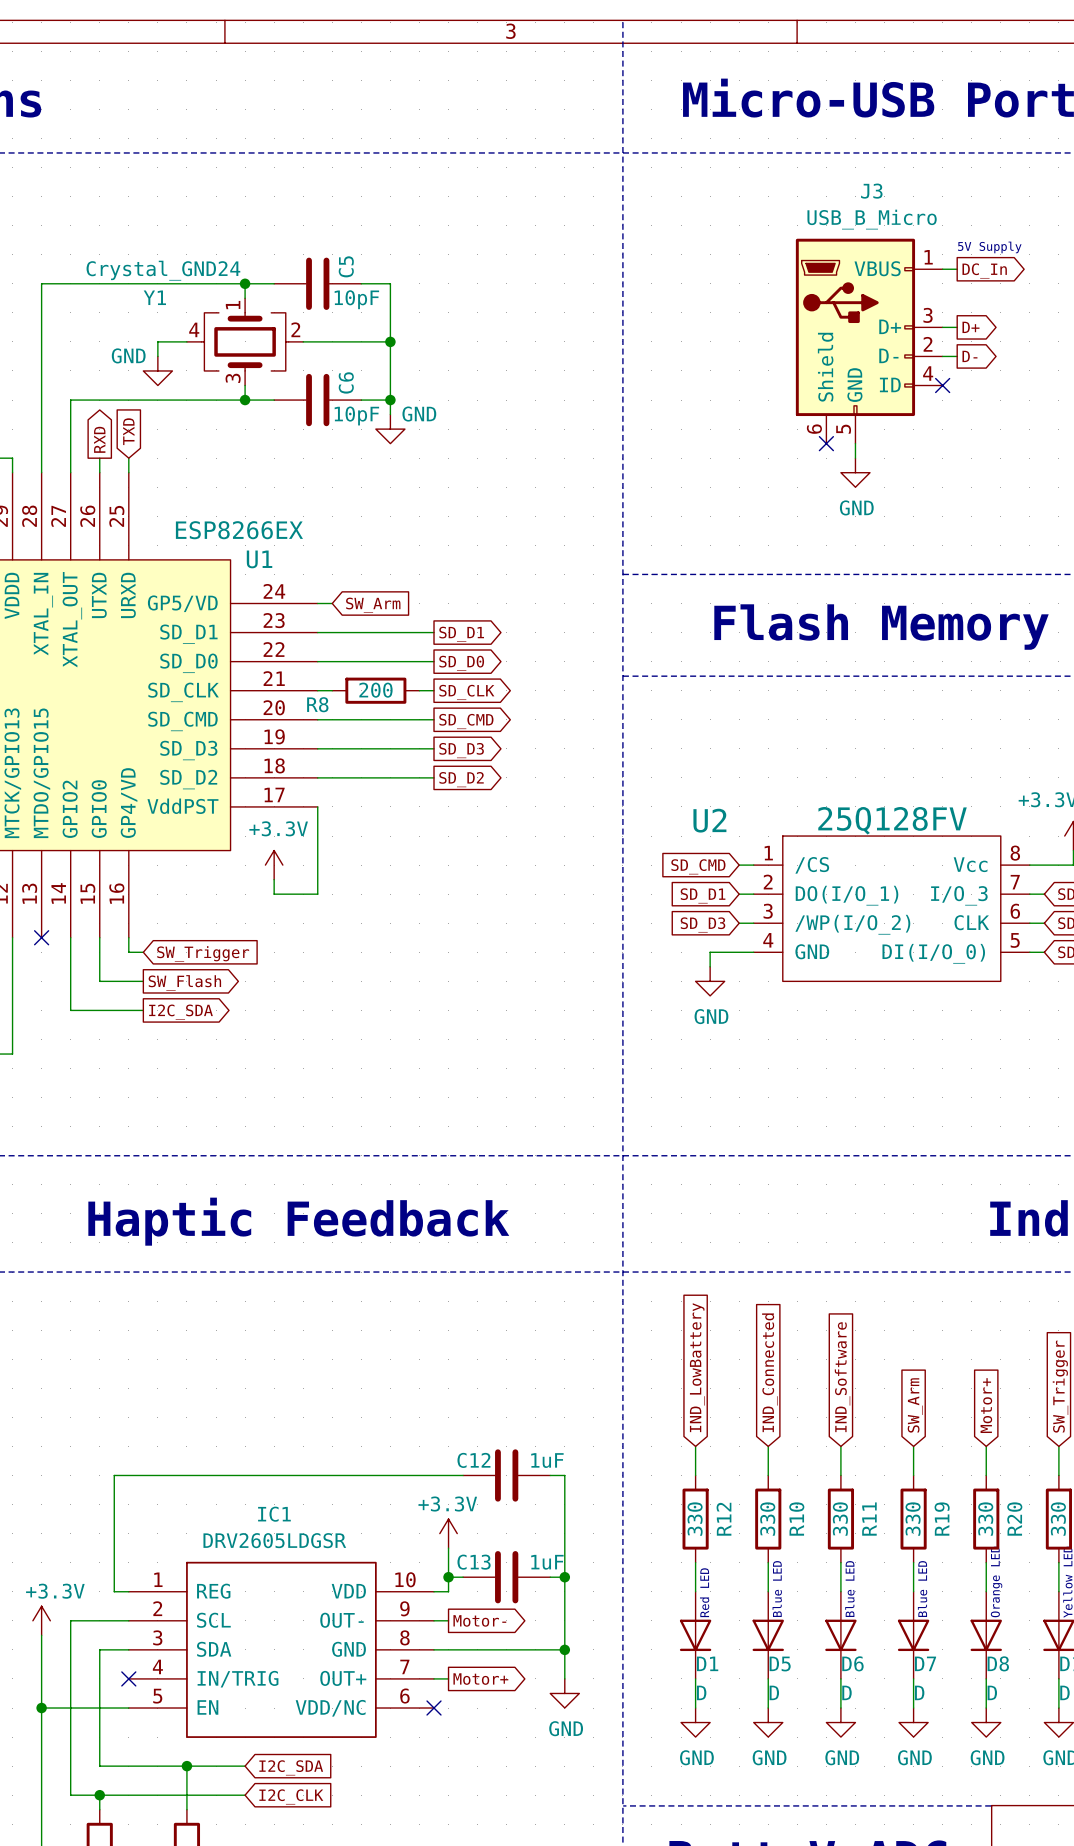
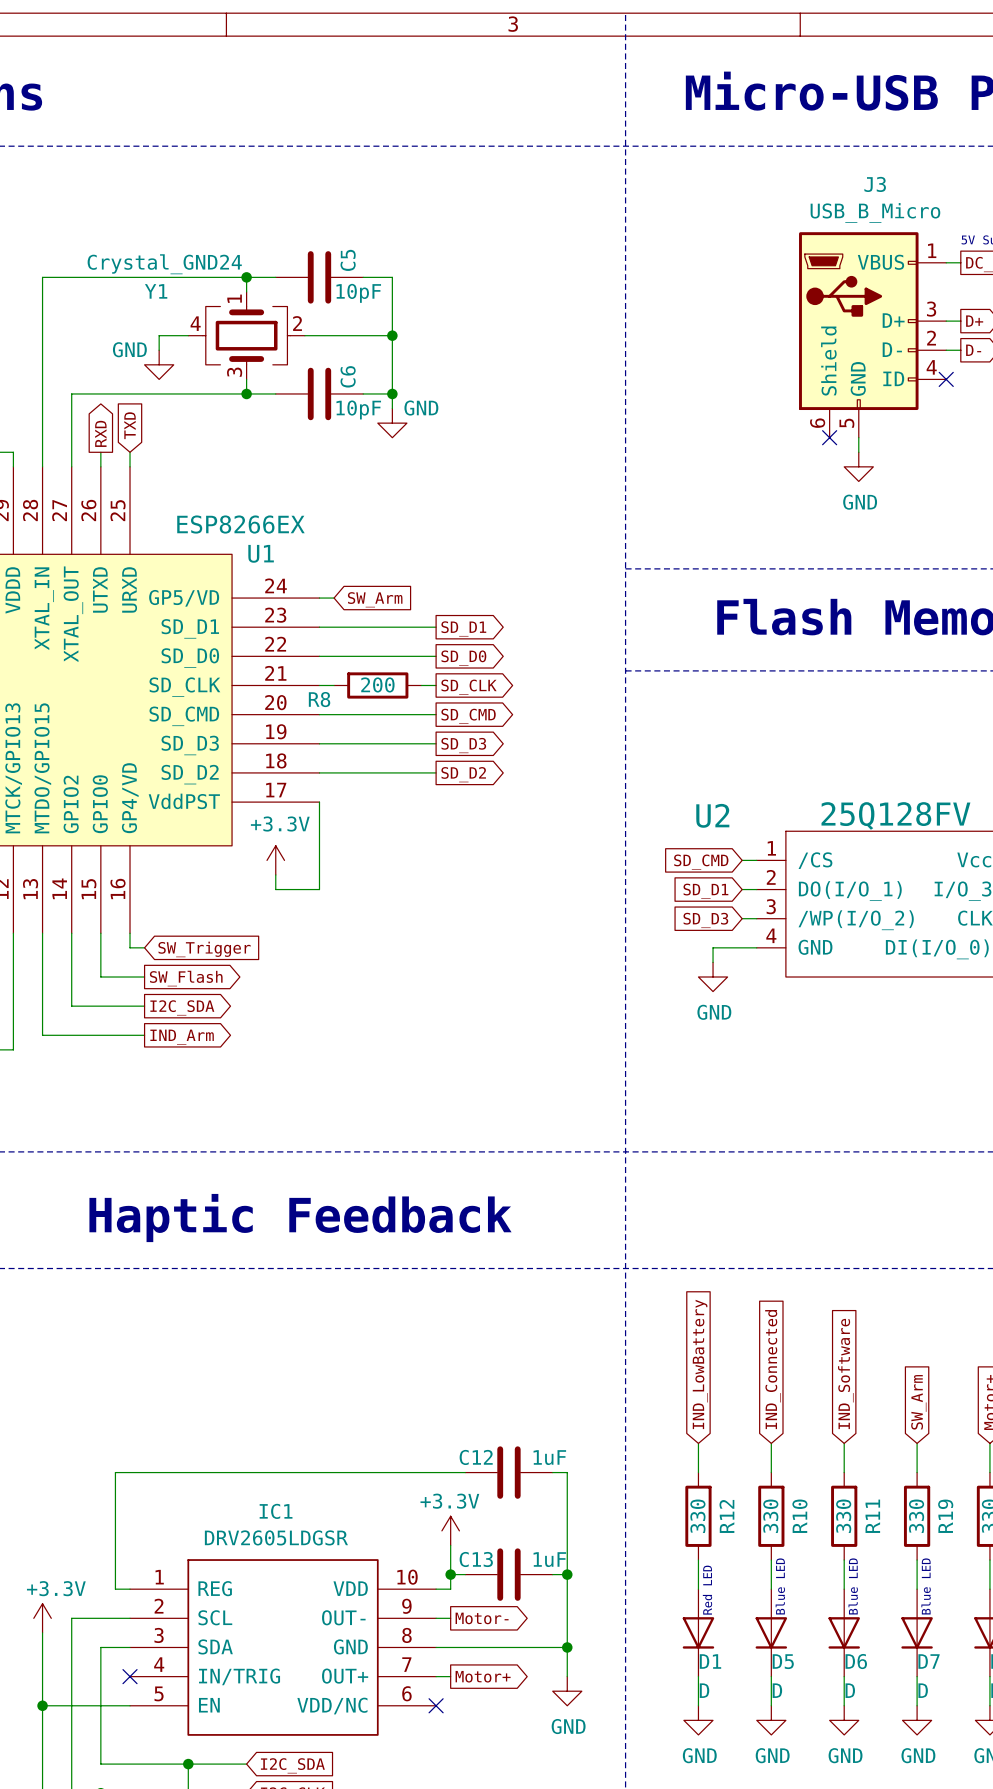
wire: none -> (42, 933) (42, 1035) (144, 1035)
no-connect mark: (41, 937) -> none
global label: none -> IND_Arm (182, 1037)

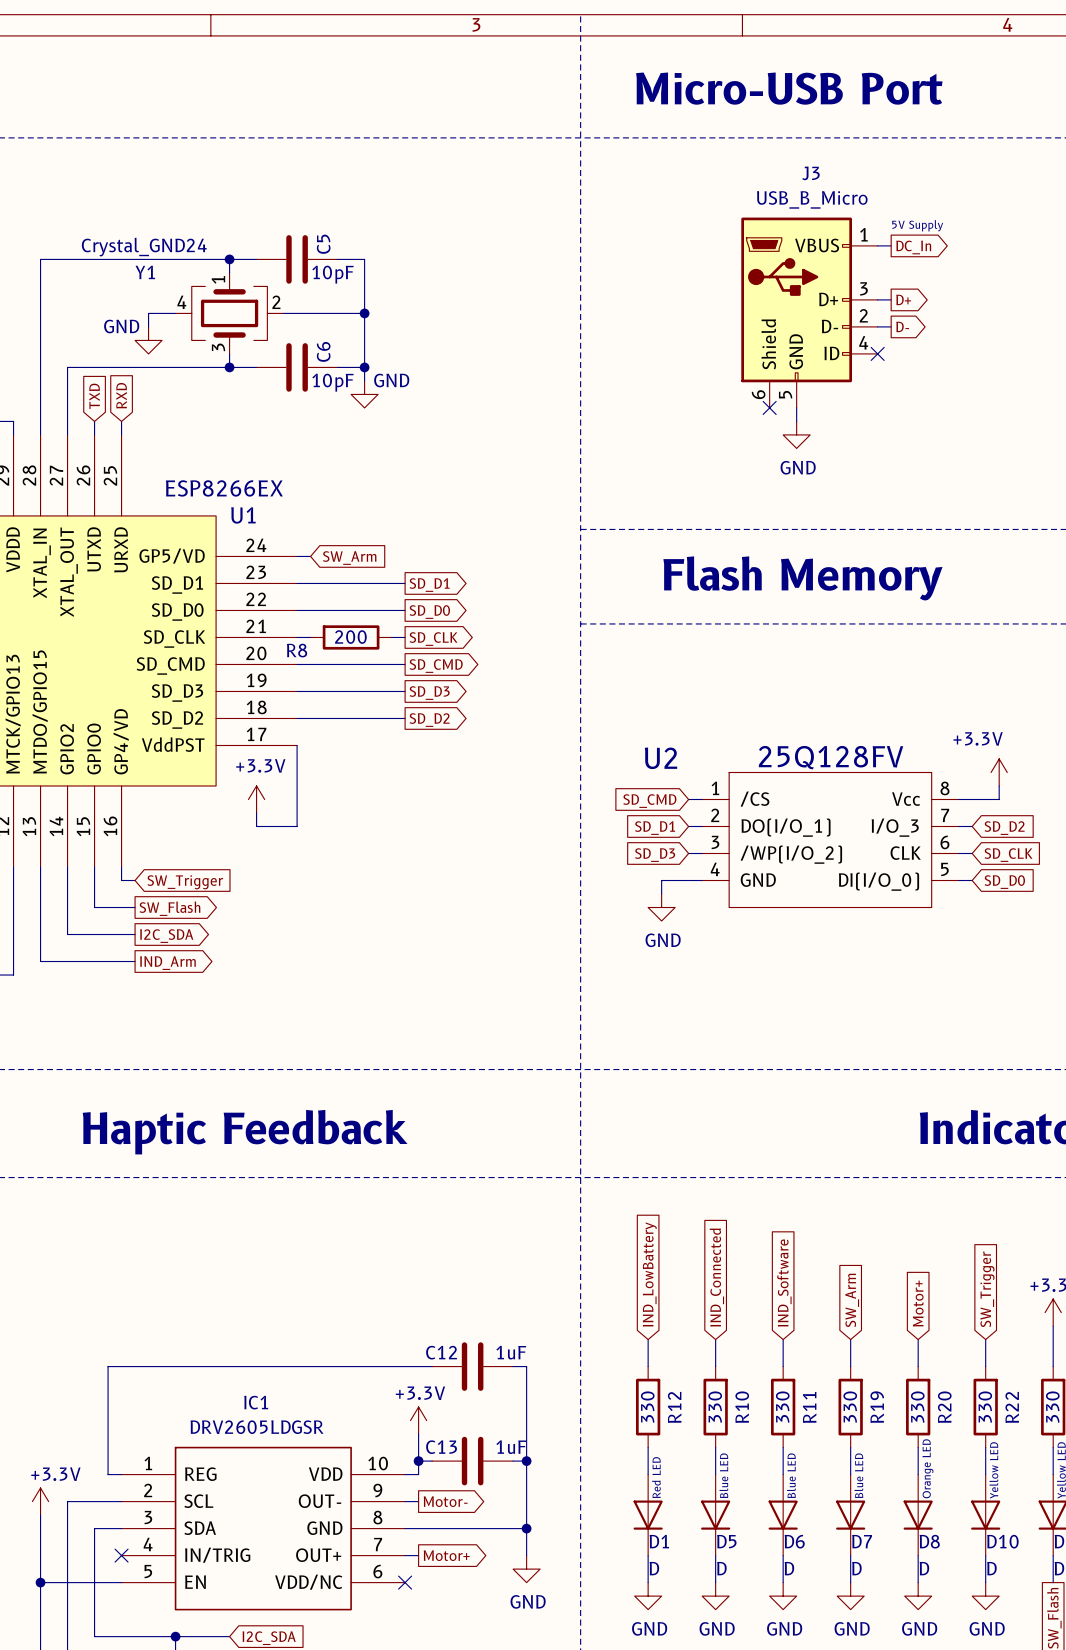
global label: TXD (130, 425) -> RXD (121, 395)
global label shape: output (100, 433) -> input (94, 396)
global label: RXD (100, 433) -> TXD (94, 396)

